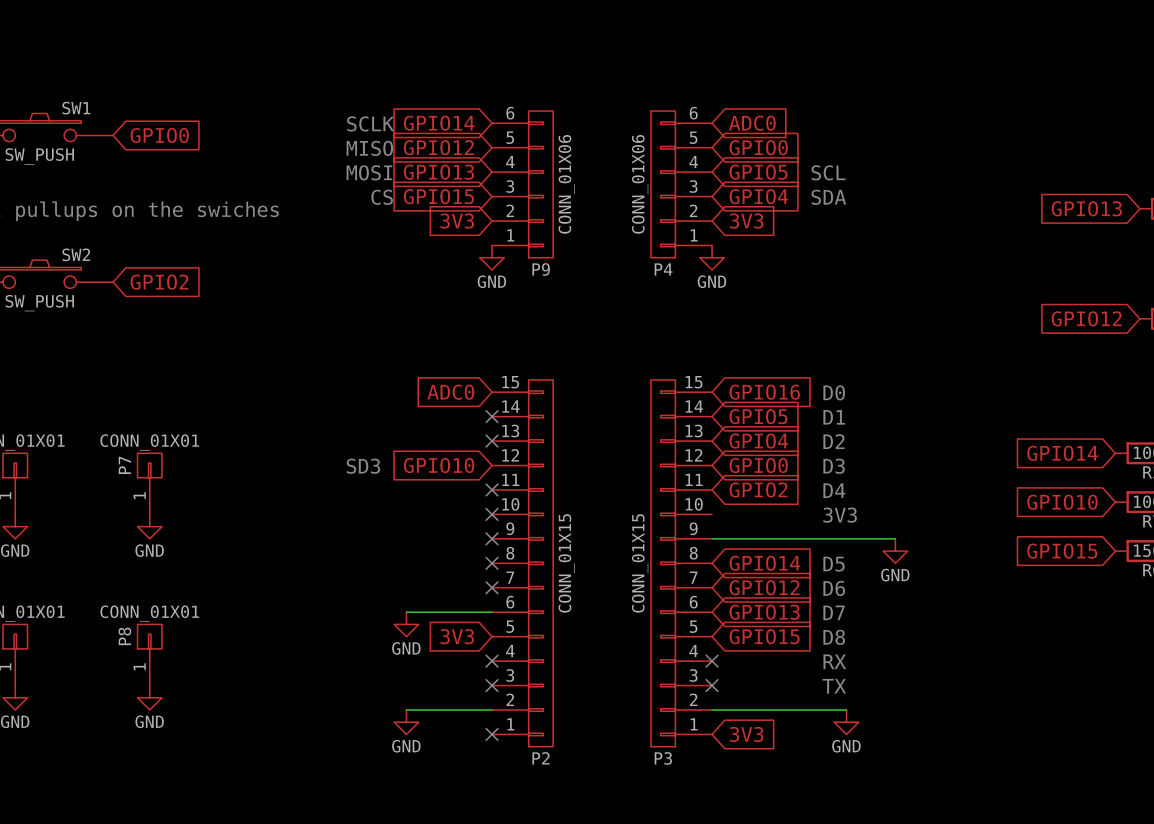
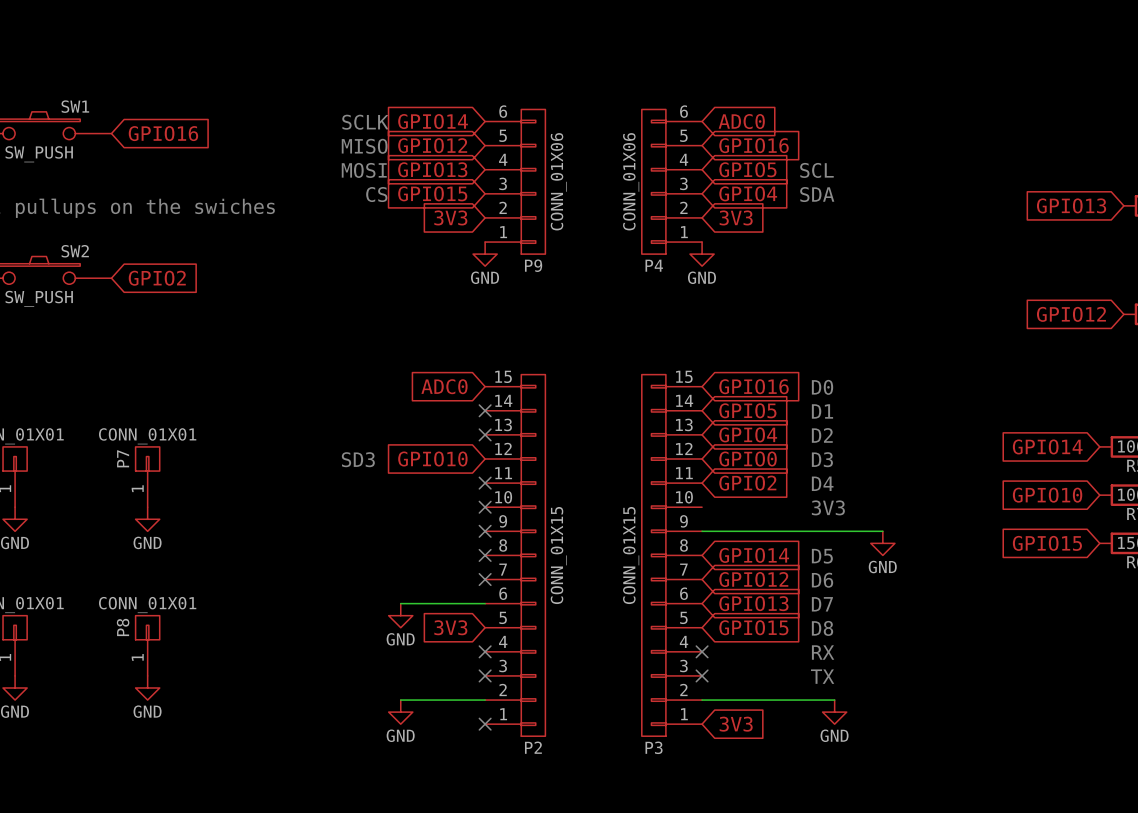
global label: GPIO0 (159, 135) -> GPIO16 (163, 133)
global label: GPIO0 (758, 147) -> GPIO16 (754, 145)

